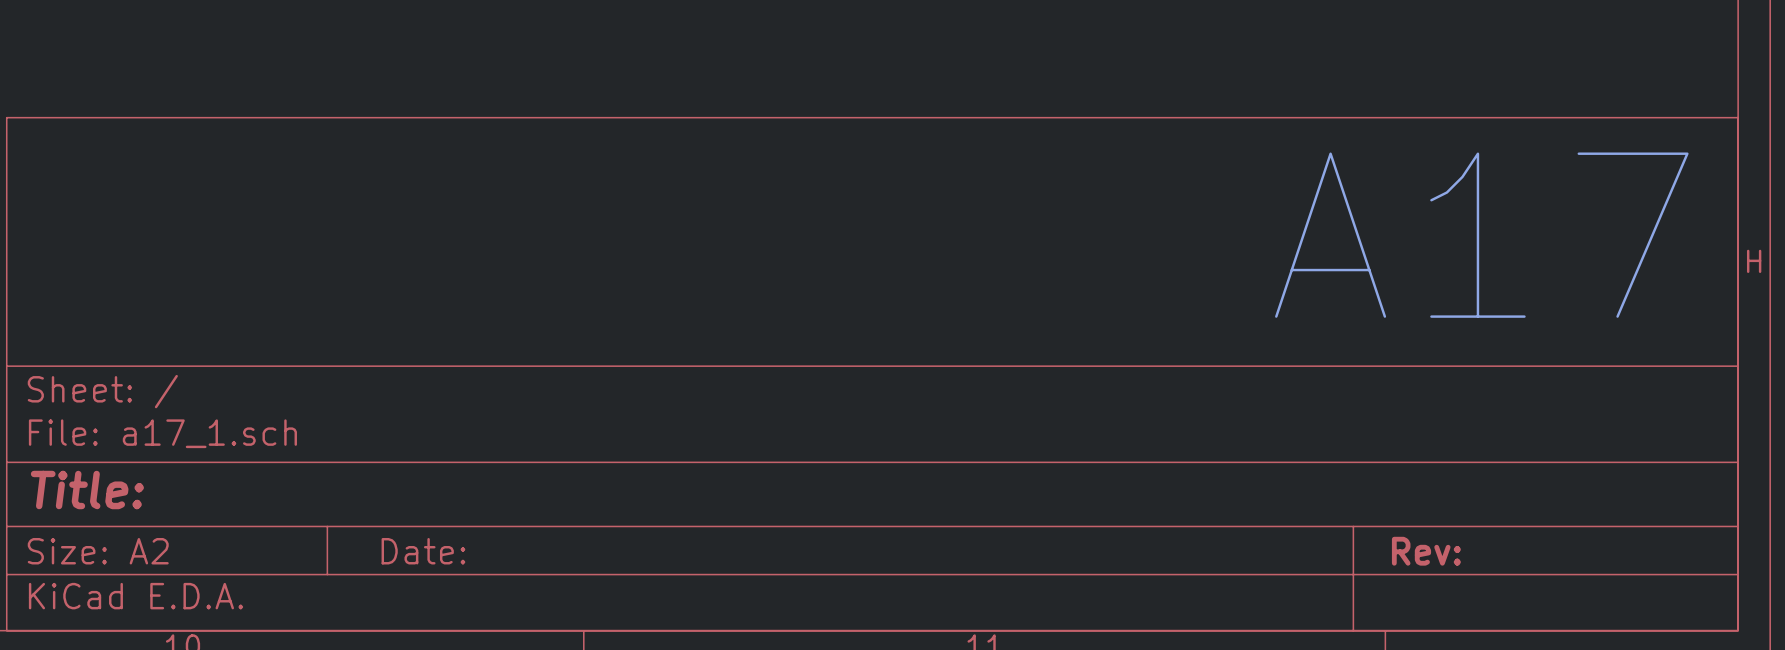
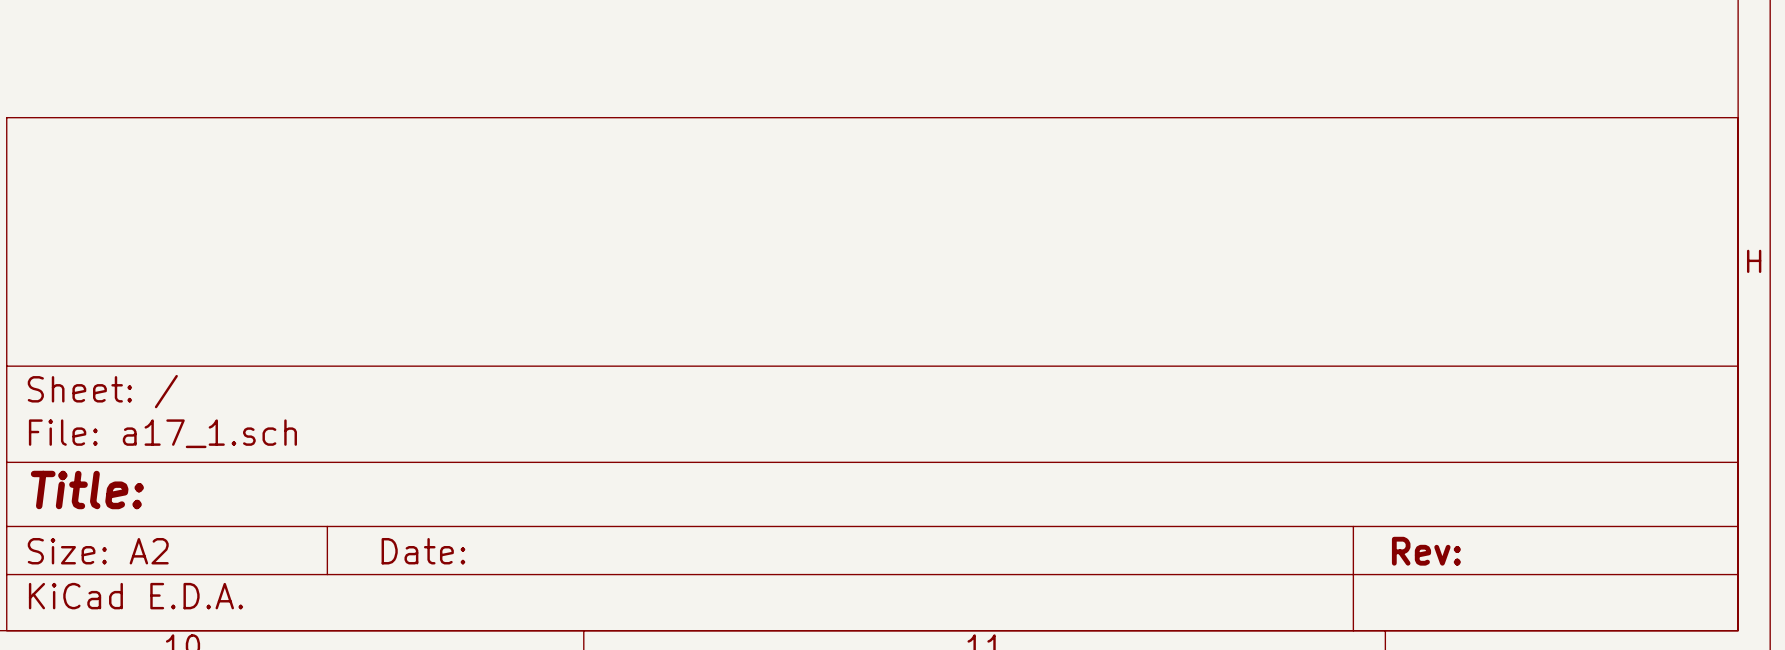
text: A17 (1481, 235) -> none

